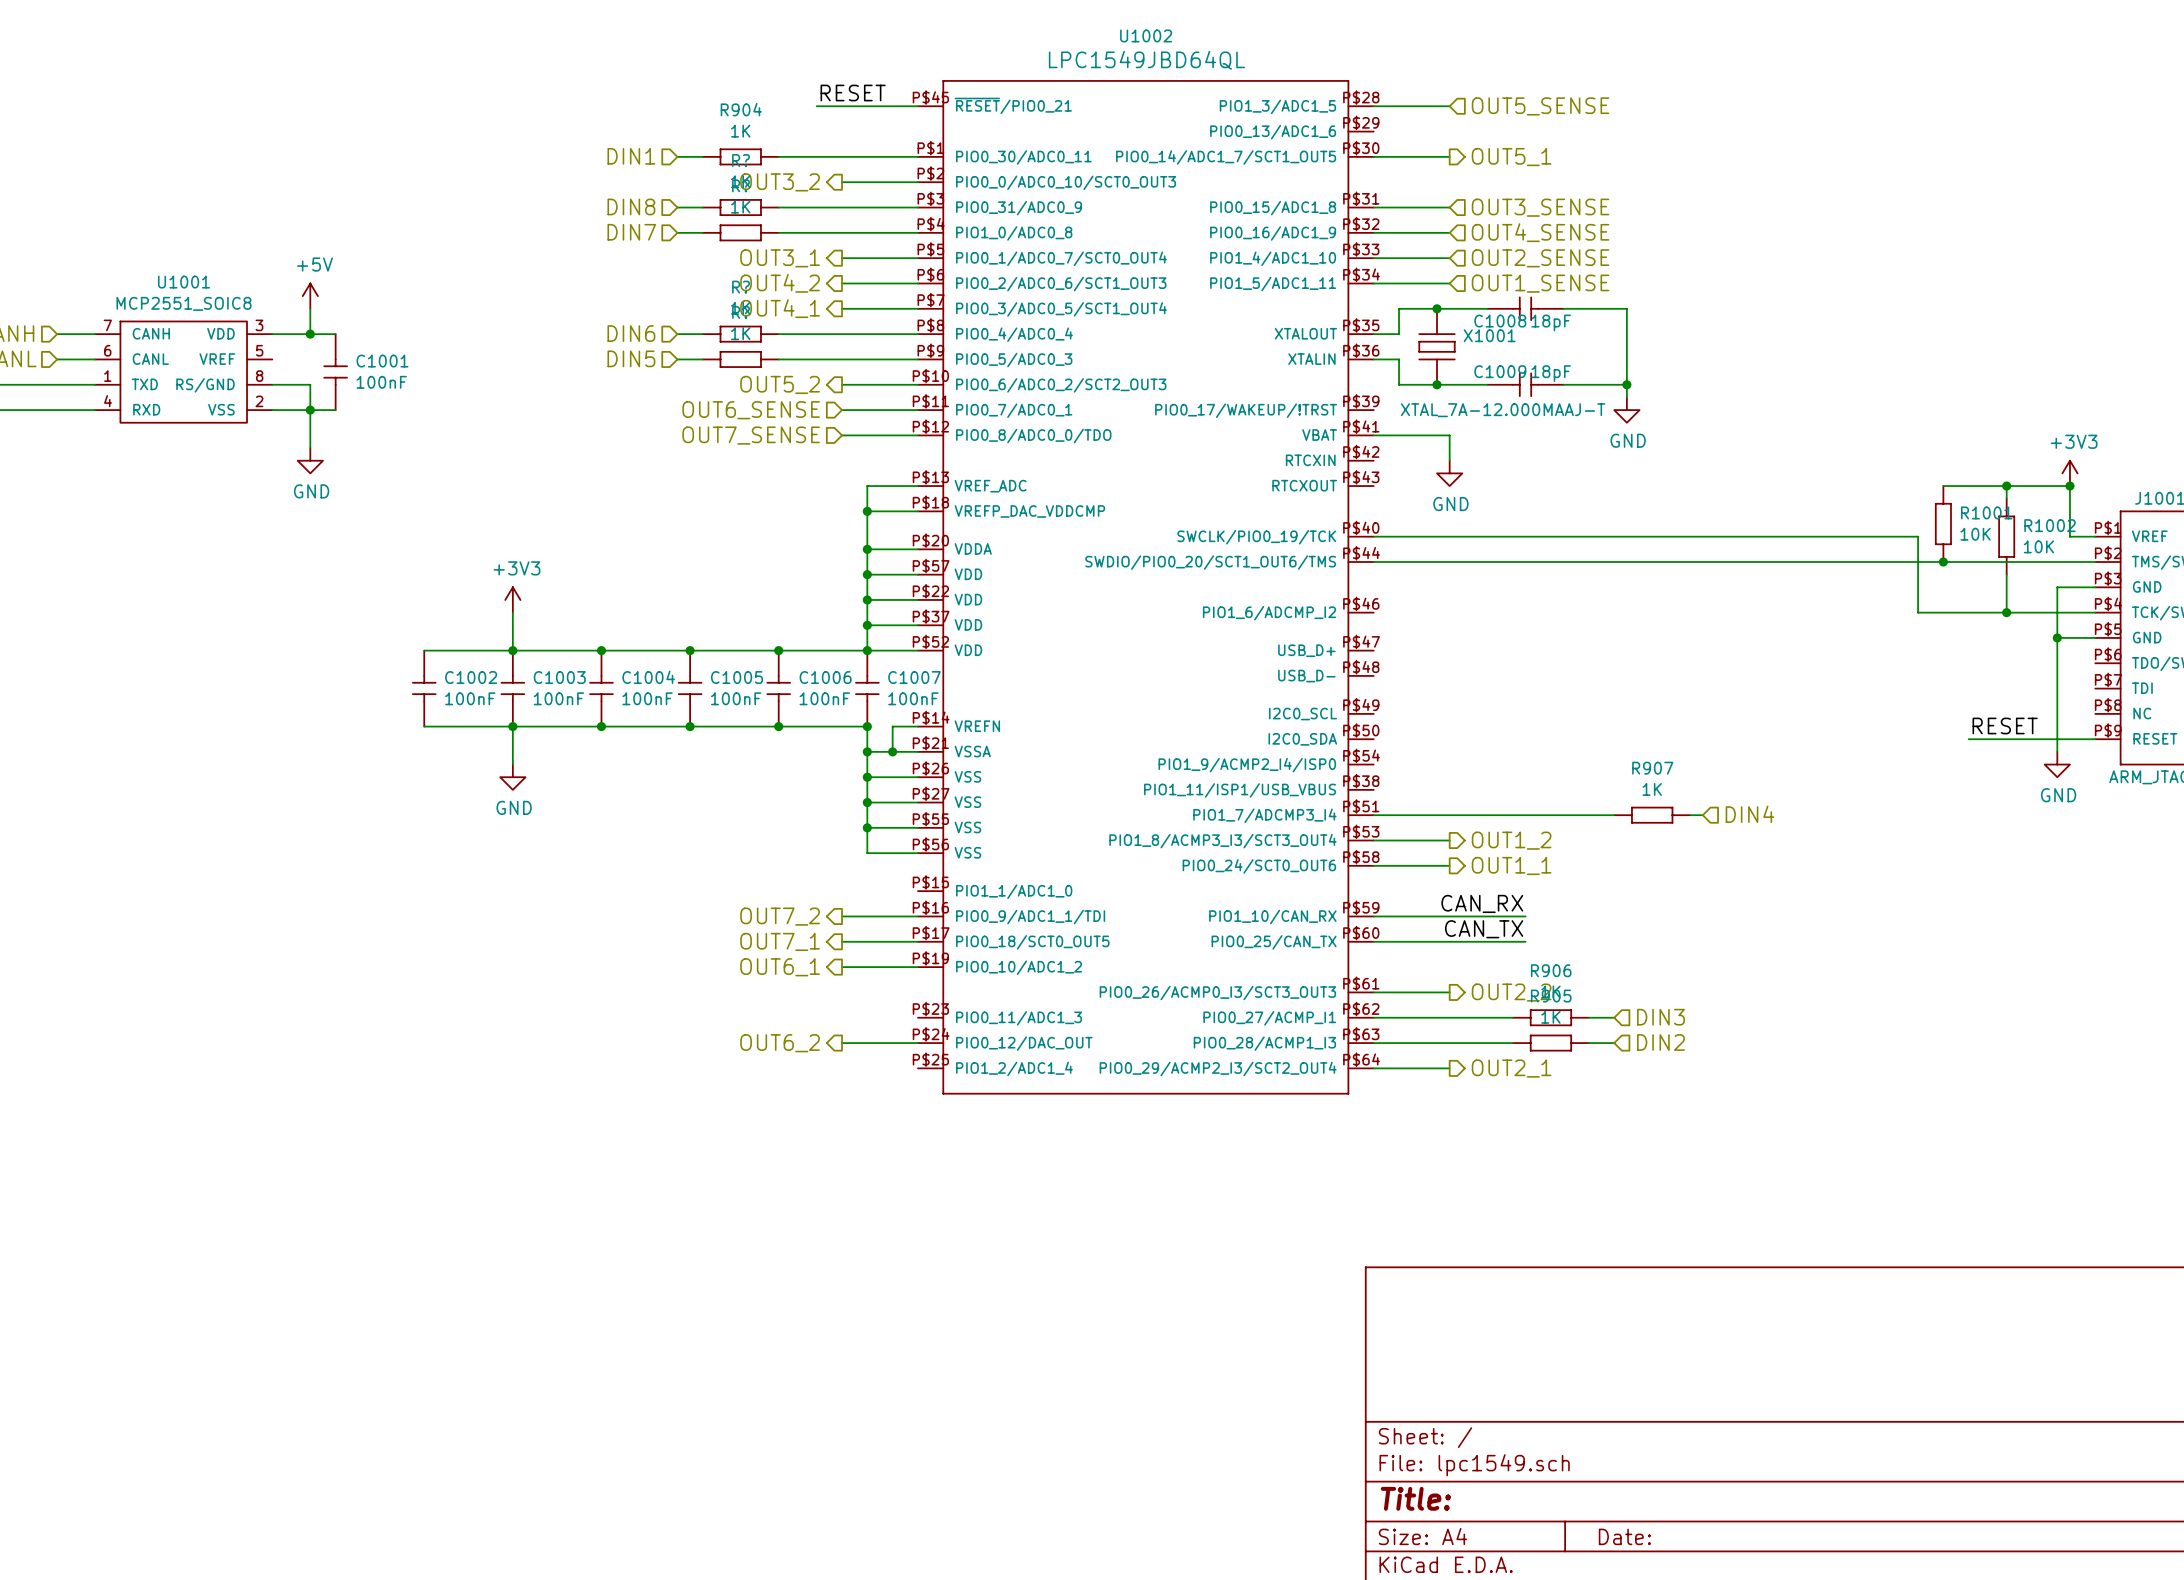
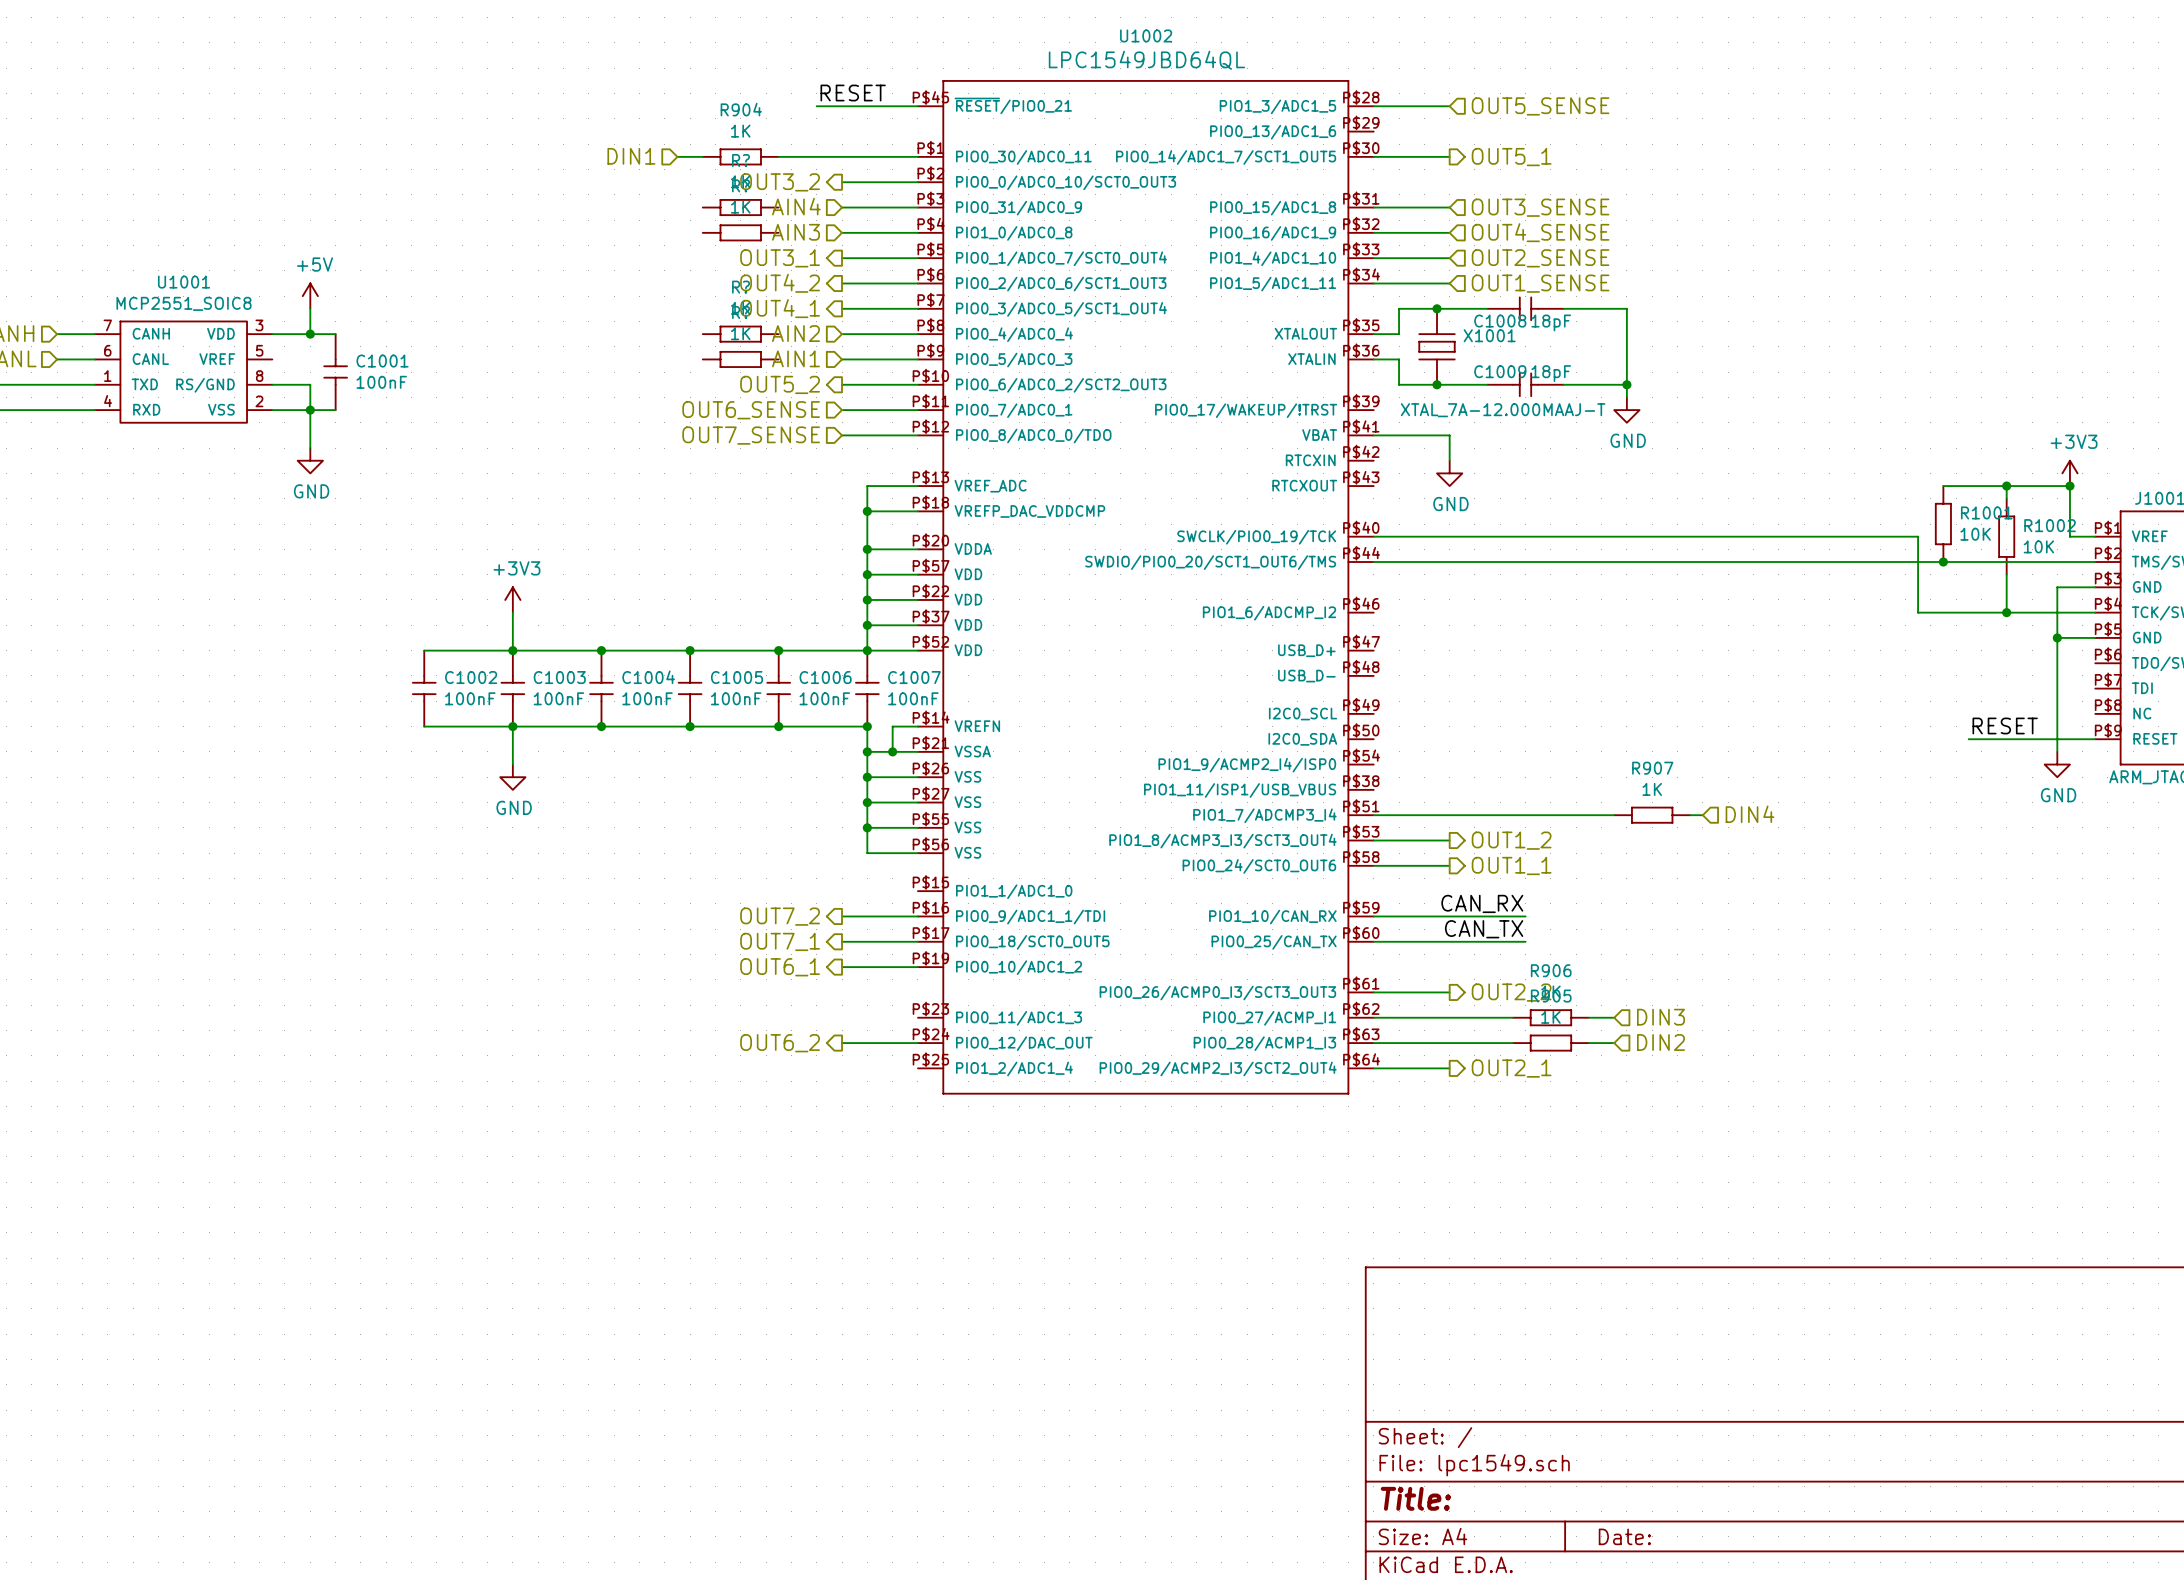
hierarchical label: DIN8 (631, 206) -> none
hierarchical label: none -> AIN4 (796, 206)
wire: (677, 207) (702, 207) -> none
wire: (778, 207) (842, 207) -> none
hierarchical label: DIN7 (631, 232) -> none
wire: (677, 232) (702, 232) -> none
wire: (778, 232) (842, 232) -> none
hierarchical label: none -> AIN3 (795, 232)
hierarchical label: DIN6 (631, 333) -> none
hierarchical label: none -> AIN2 (795, 333)
wire: (677, 334) (702, 334) -> none
wire: (778, 334) (842, 334) -> none
hierarchical label: DIN5 (631, 358) -> none
hierarchical label: none -> AIN1 (795, 358)
wire: (677, 359) (702, 359) -> none
wire: (778, 359) (842, 359) -> none

